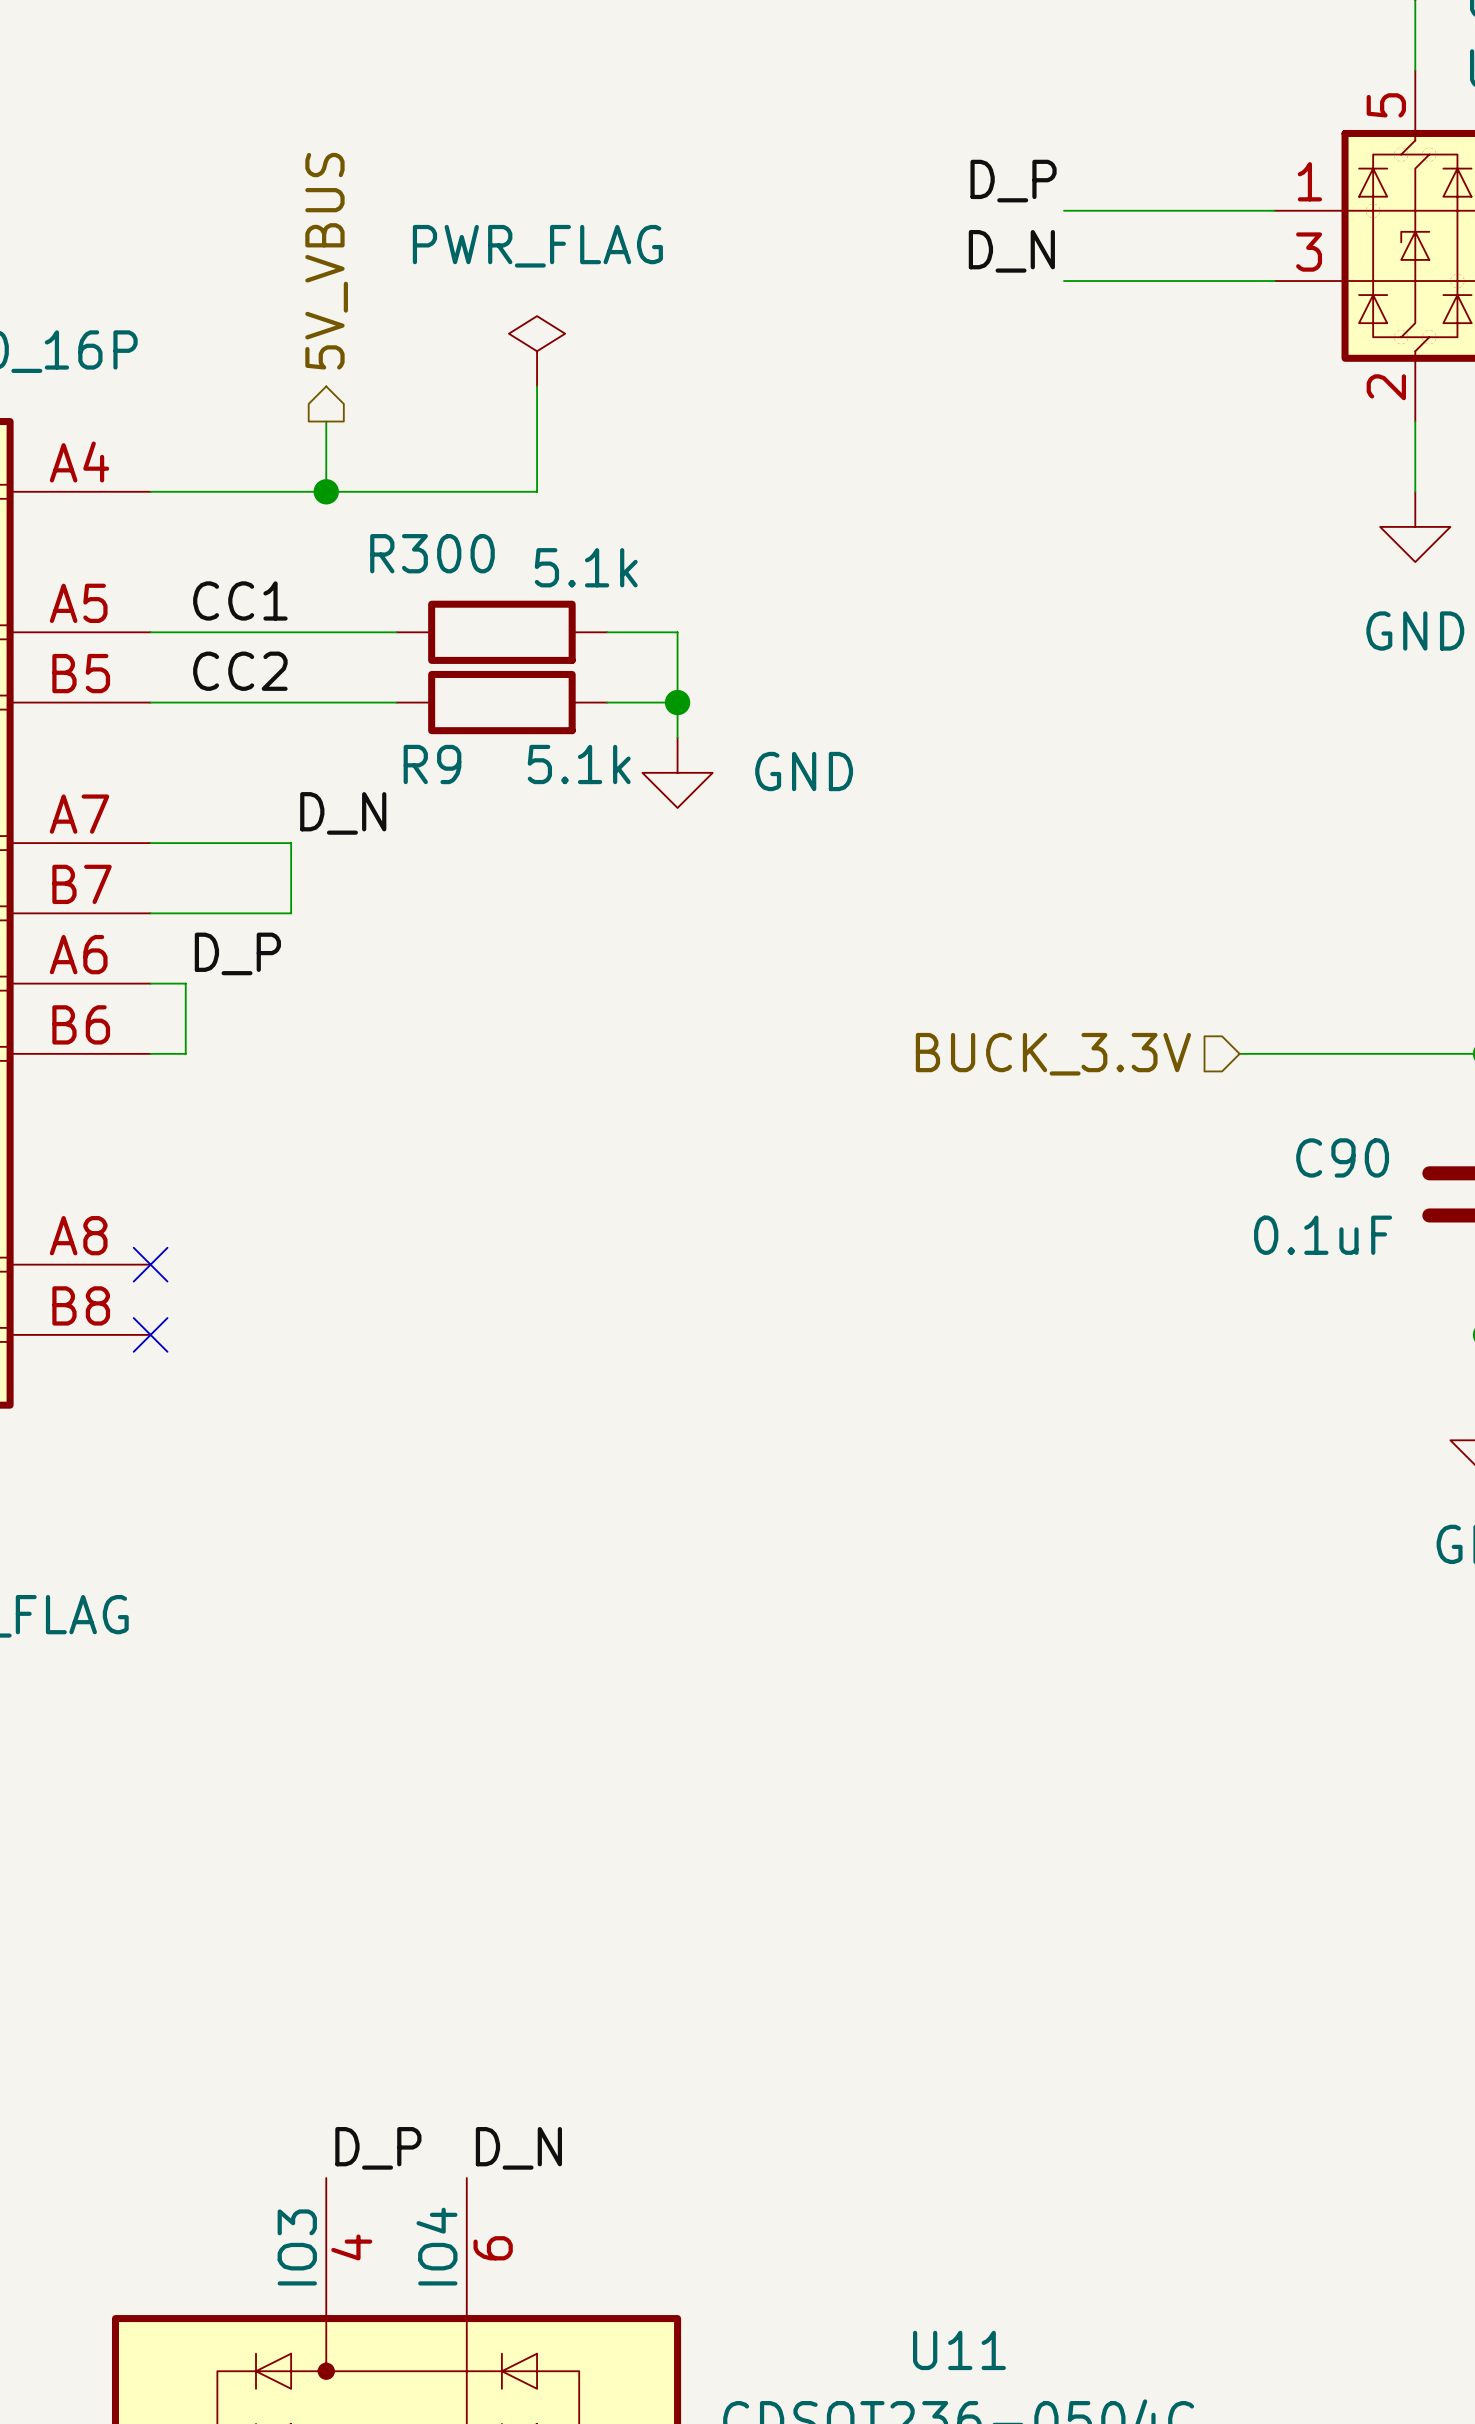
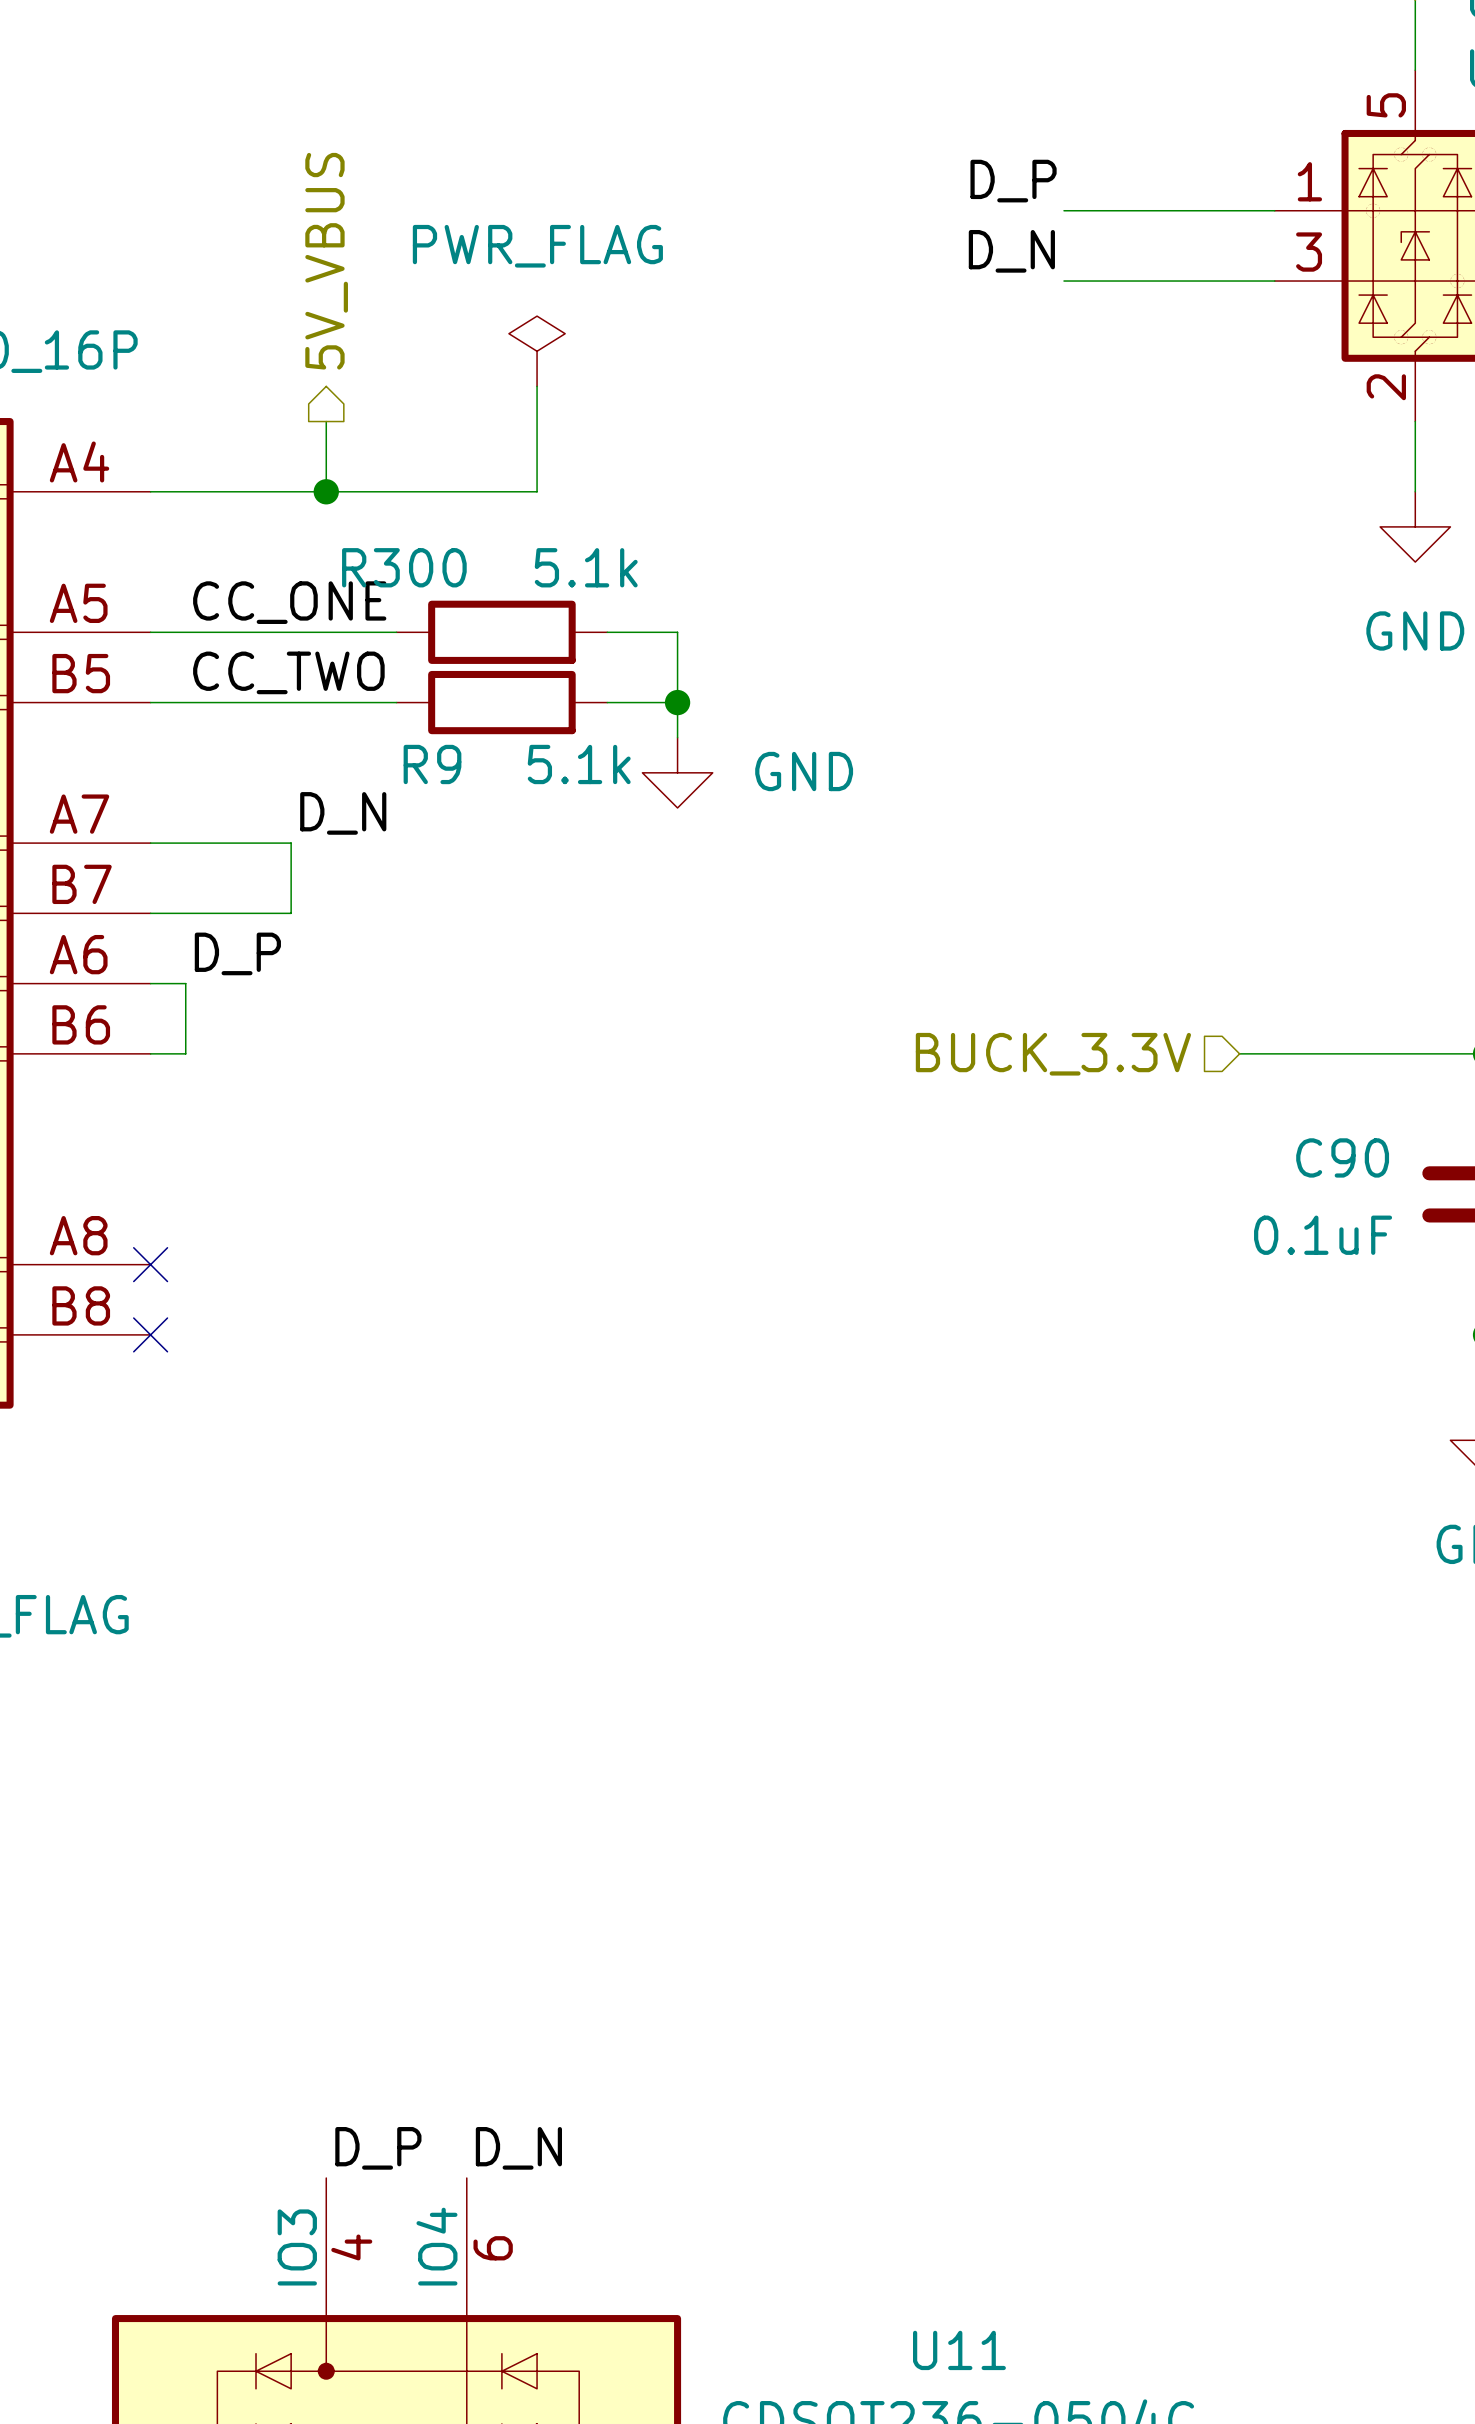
R300 name position: R300 (432, 553) -> R300 (404, 567)
label: CC1 (240, 600) -> CC_ONE (289, 602)
label: CC2 (240, 671) -> CC_TWO (288, 672)

